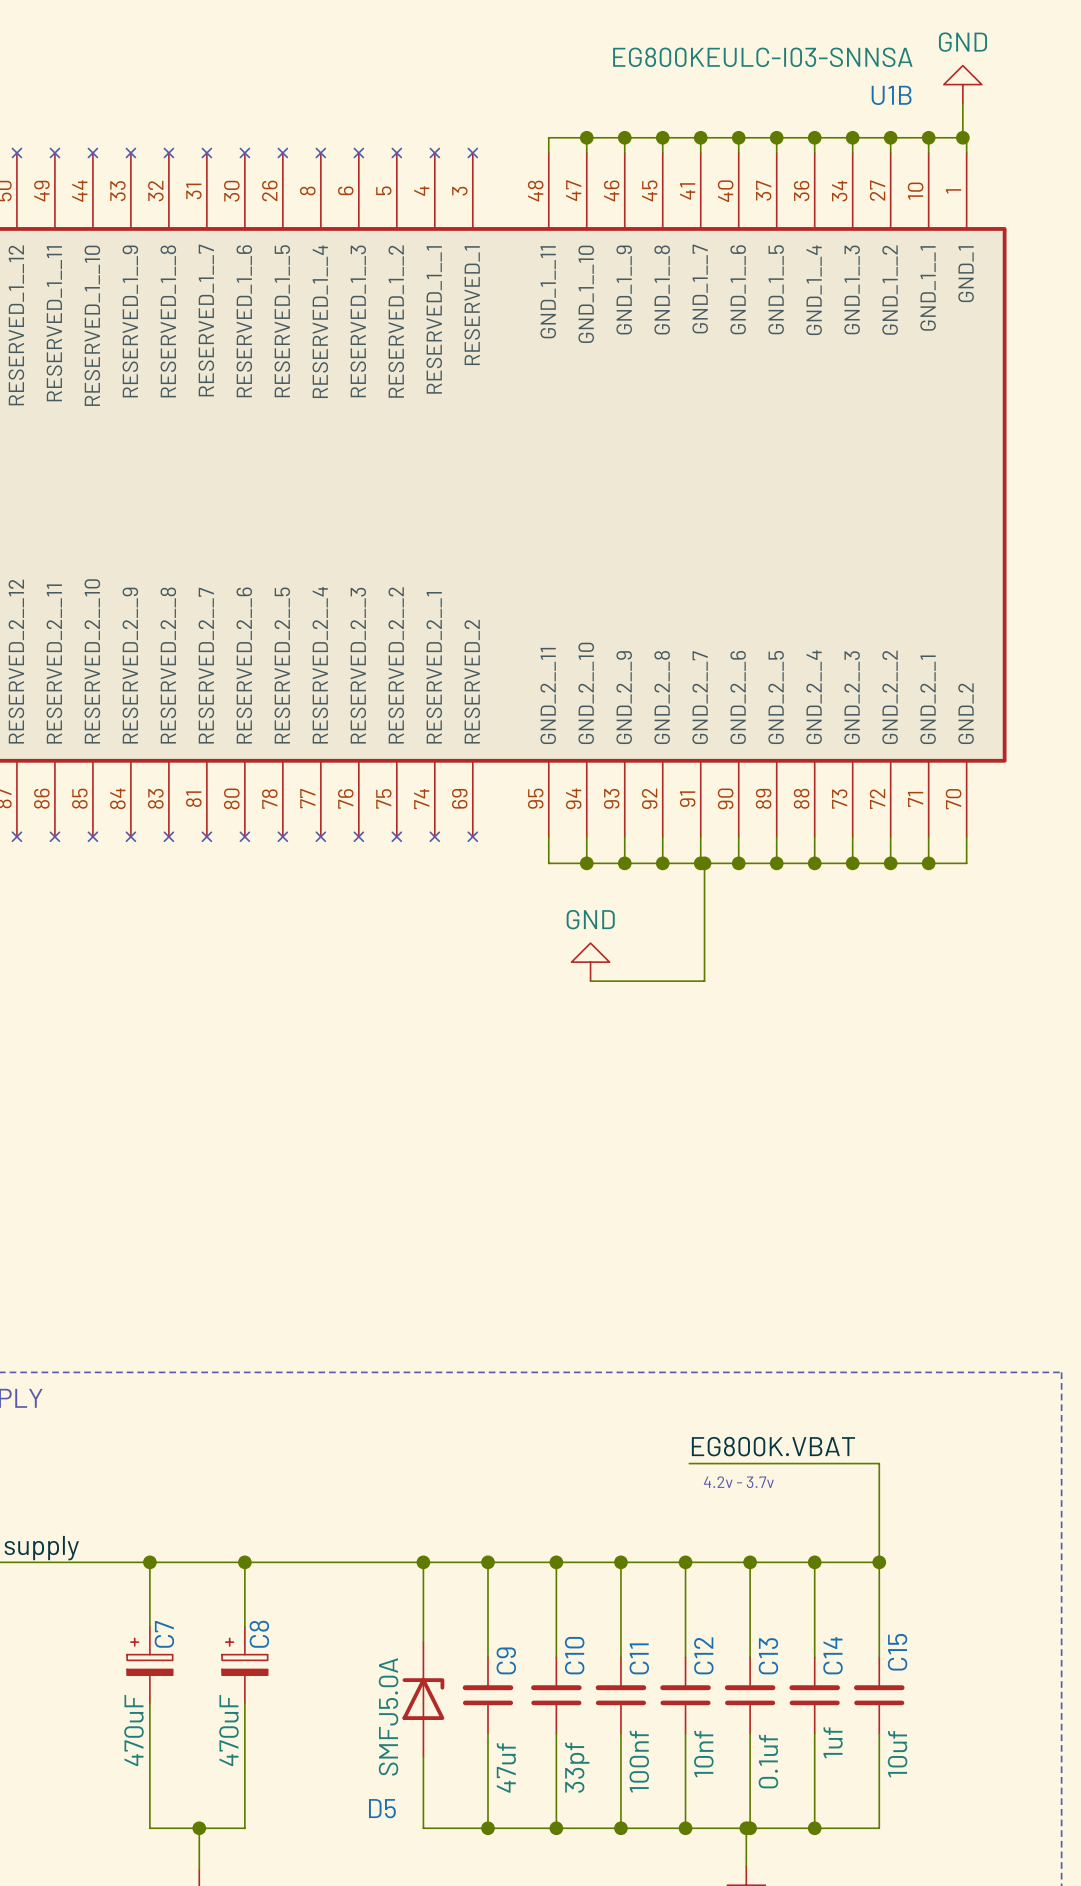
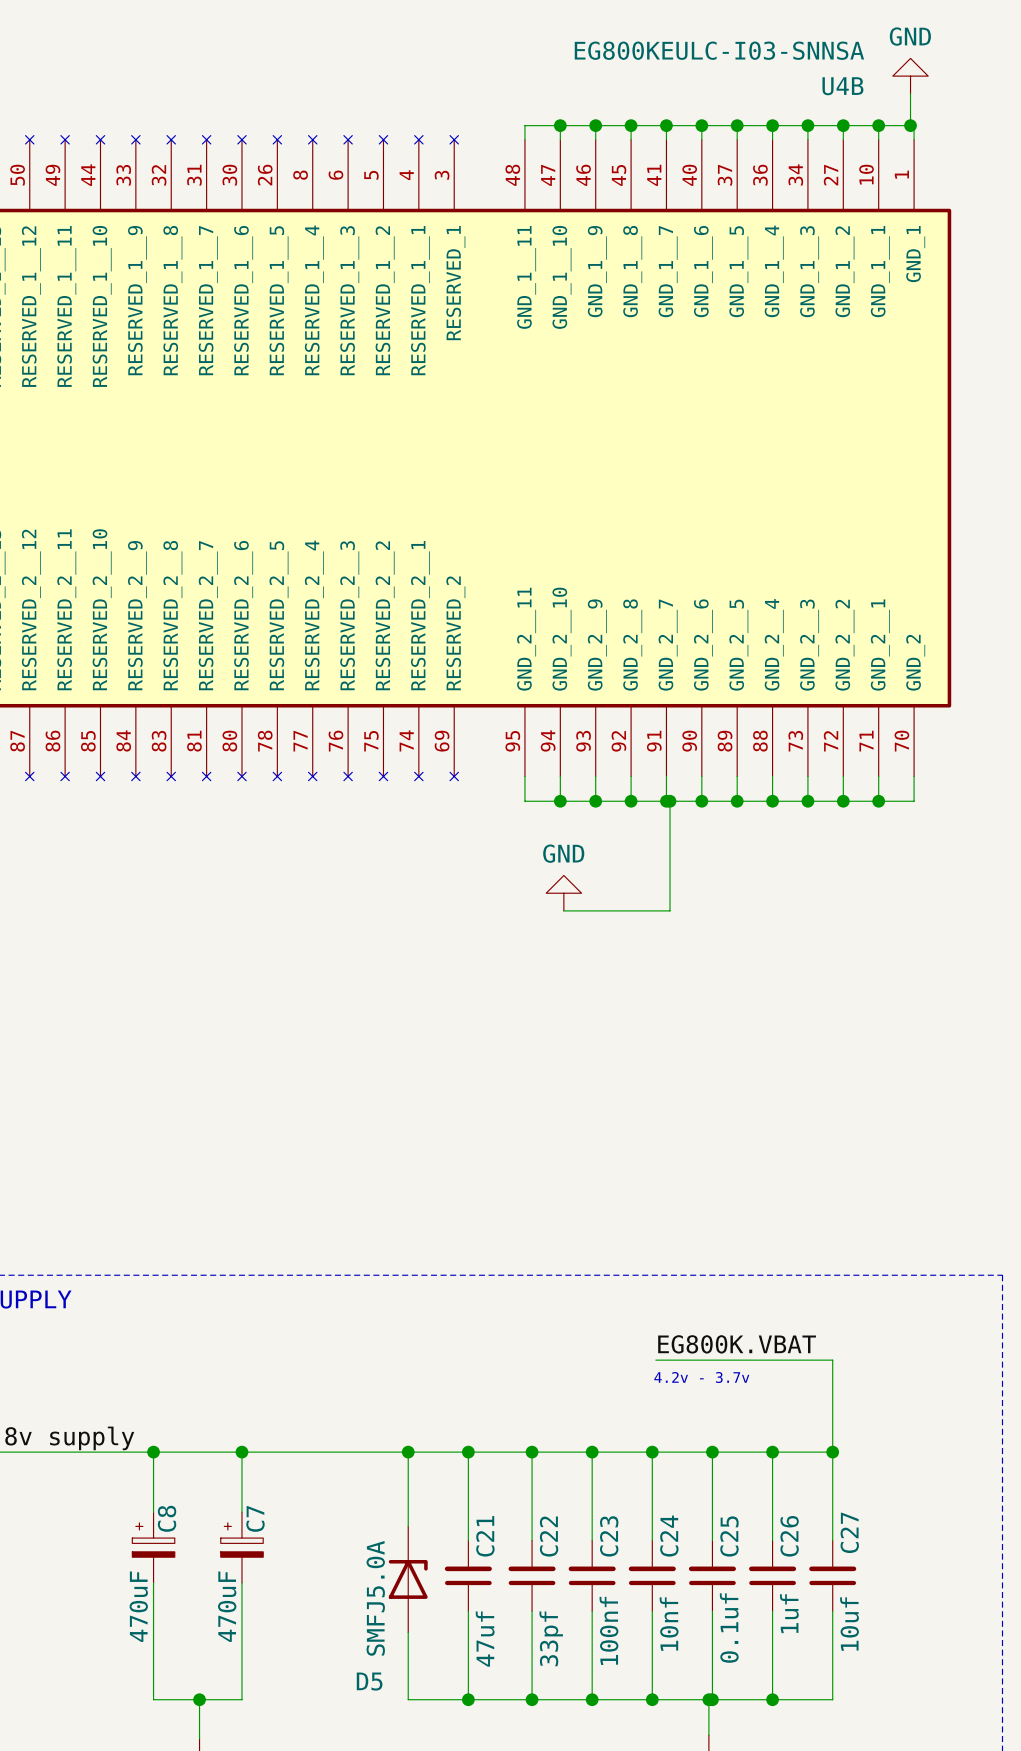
U1B name: U1B (891, 95) -> U4B (842, 86)
C7 name: C7 (164, 1634) -> C8 (167, 1518)
C8 name: C8 (259, 1634) -> C7 (255, 1518)
C15 name: C15 (897, 1652) -> C27 (849, 1532)
C10 name: C10 (574, 1655) -> C22 (549, 1536)
C12 name: C12 (703, 1655) -> C24 (669, 1536)
C14 name: C14 (832, 1655) -> C26 (789, 1536)
C13 name: C13 (768, 1656) -> C25 (729, 1536)
C11 name: C11 (639, 1658) -> C23 (609, 1536)
C9 name: C9 (506, 1660) -> C21 (485, 1536)

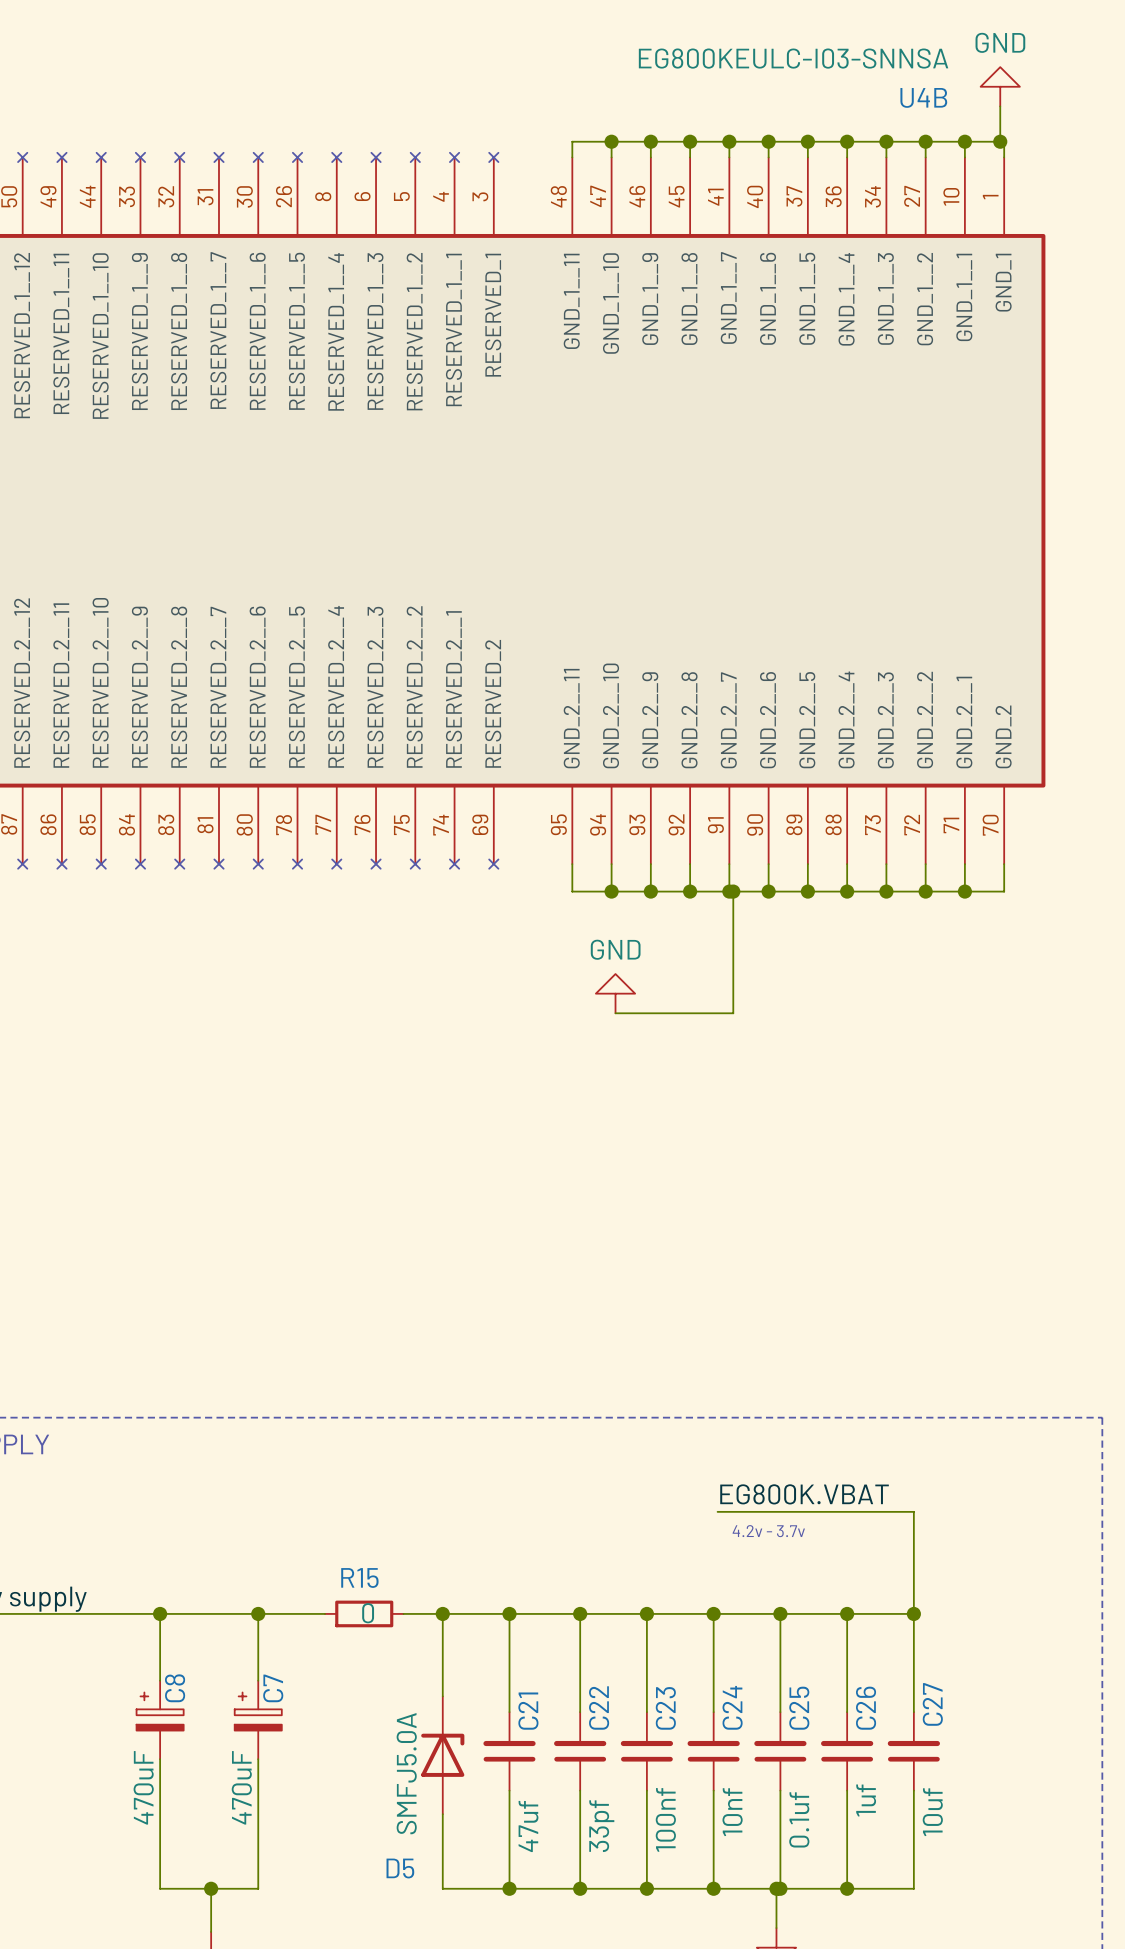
wire: (302, 1452) (372, 1452) -> none
R15: none -> 0 (364, 1613)

